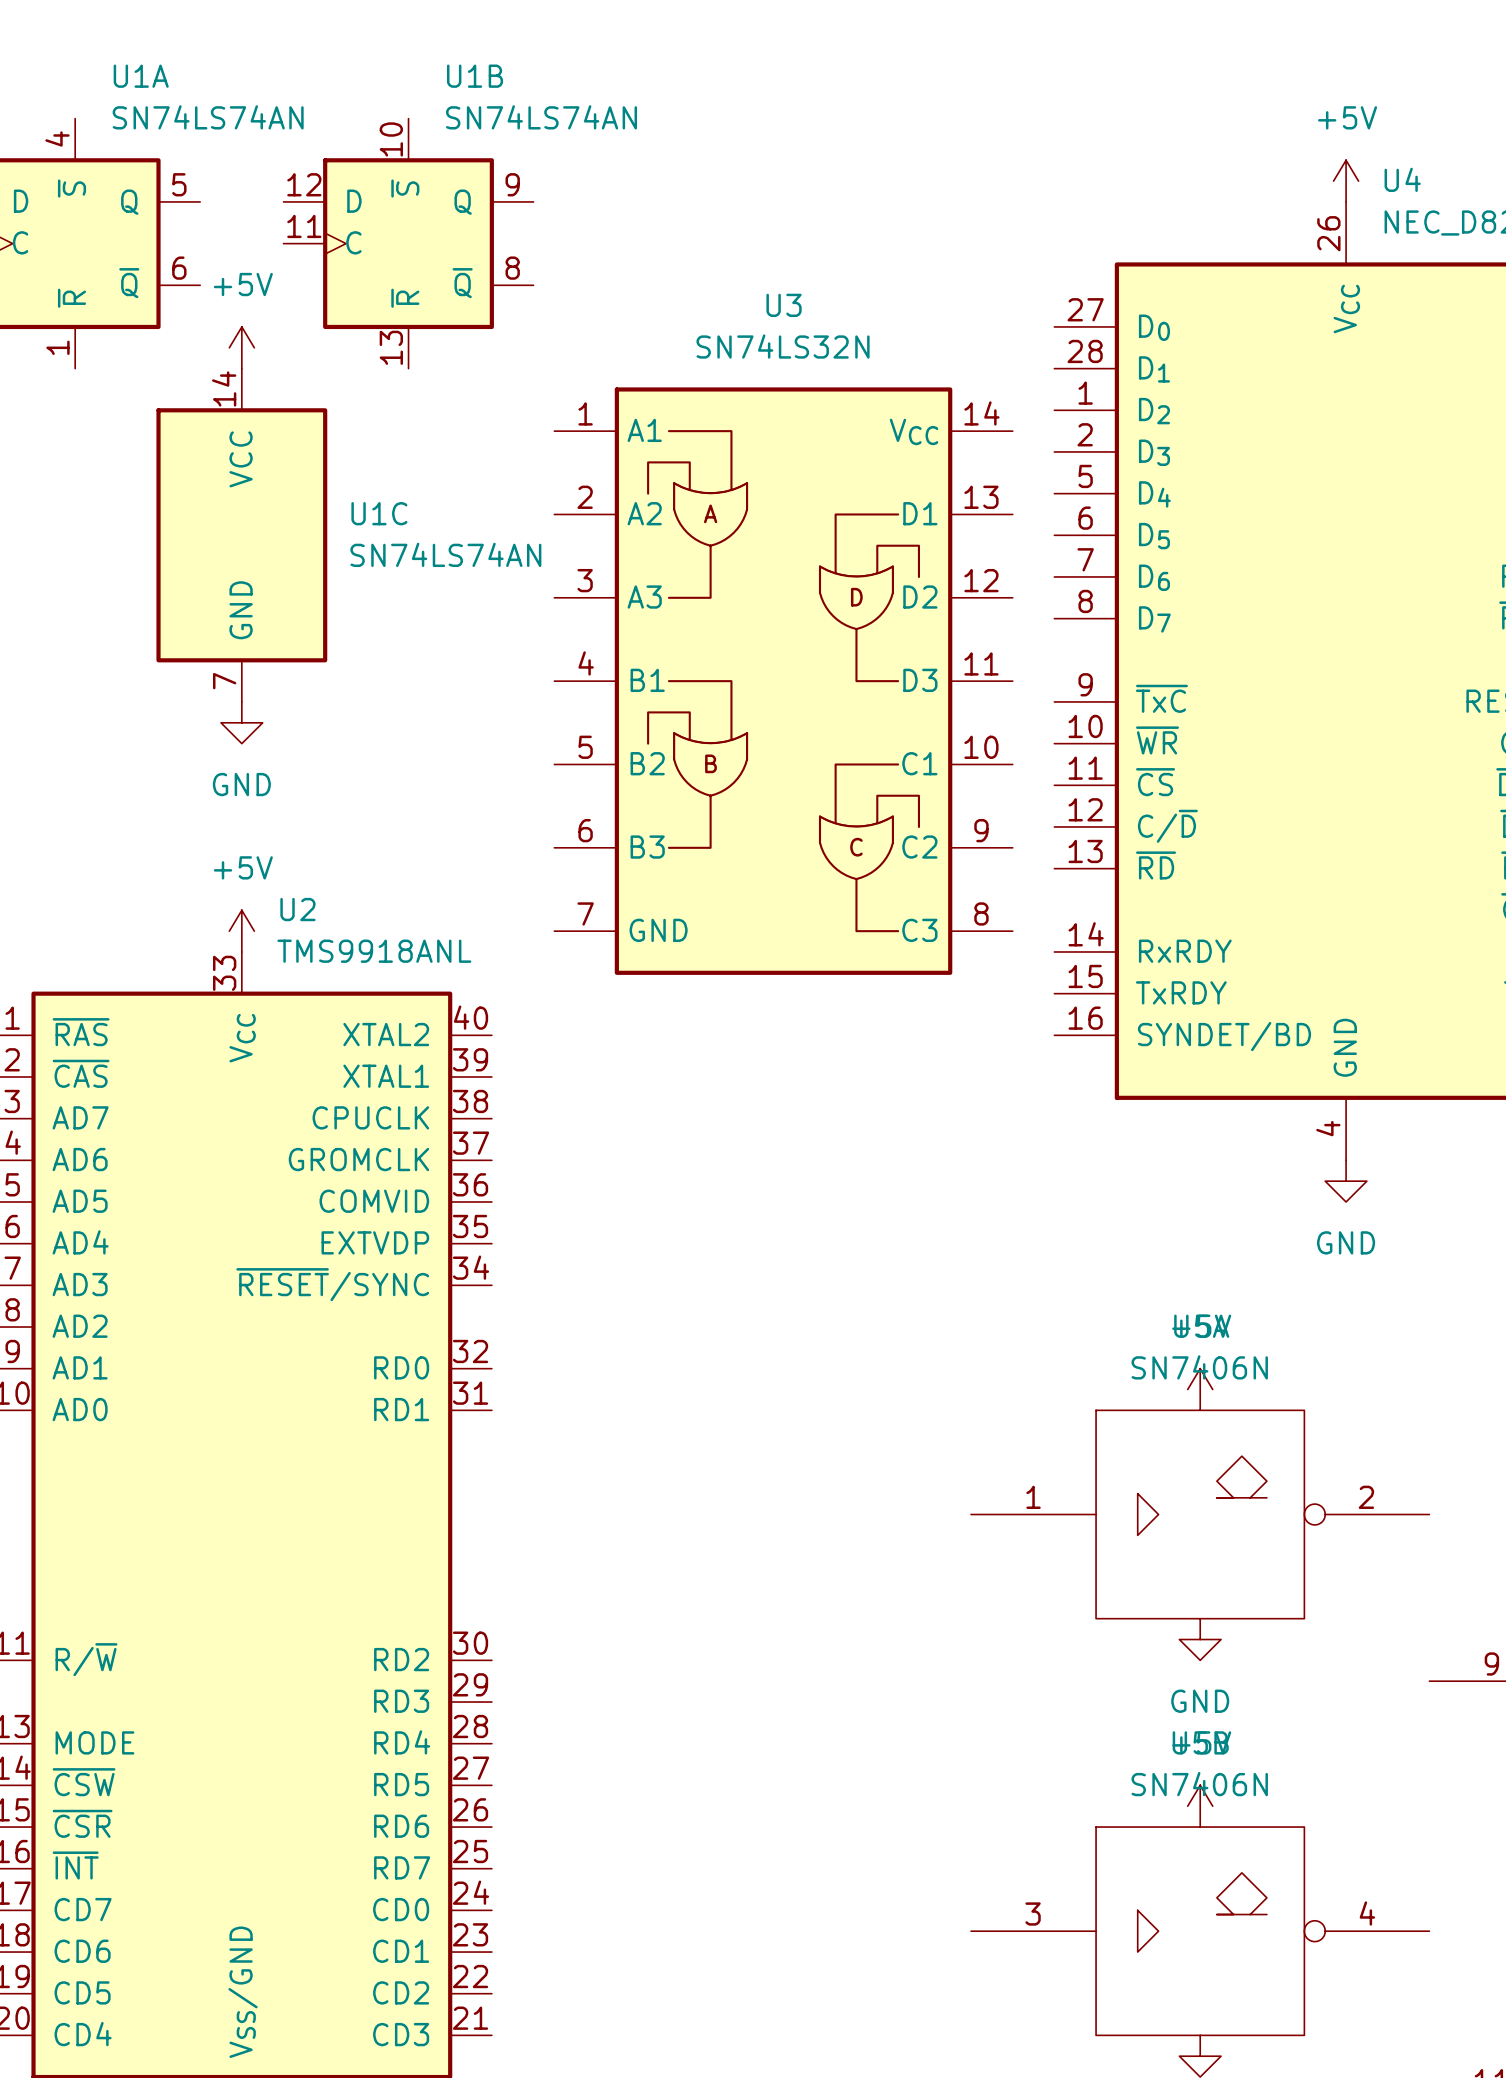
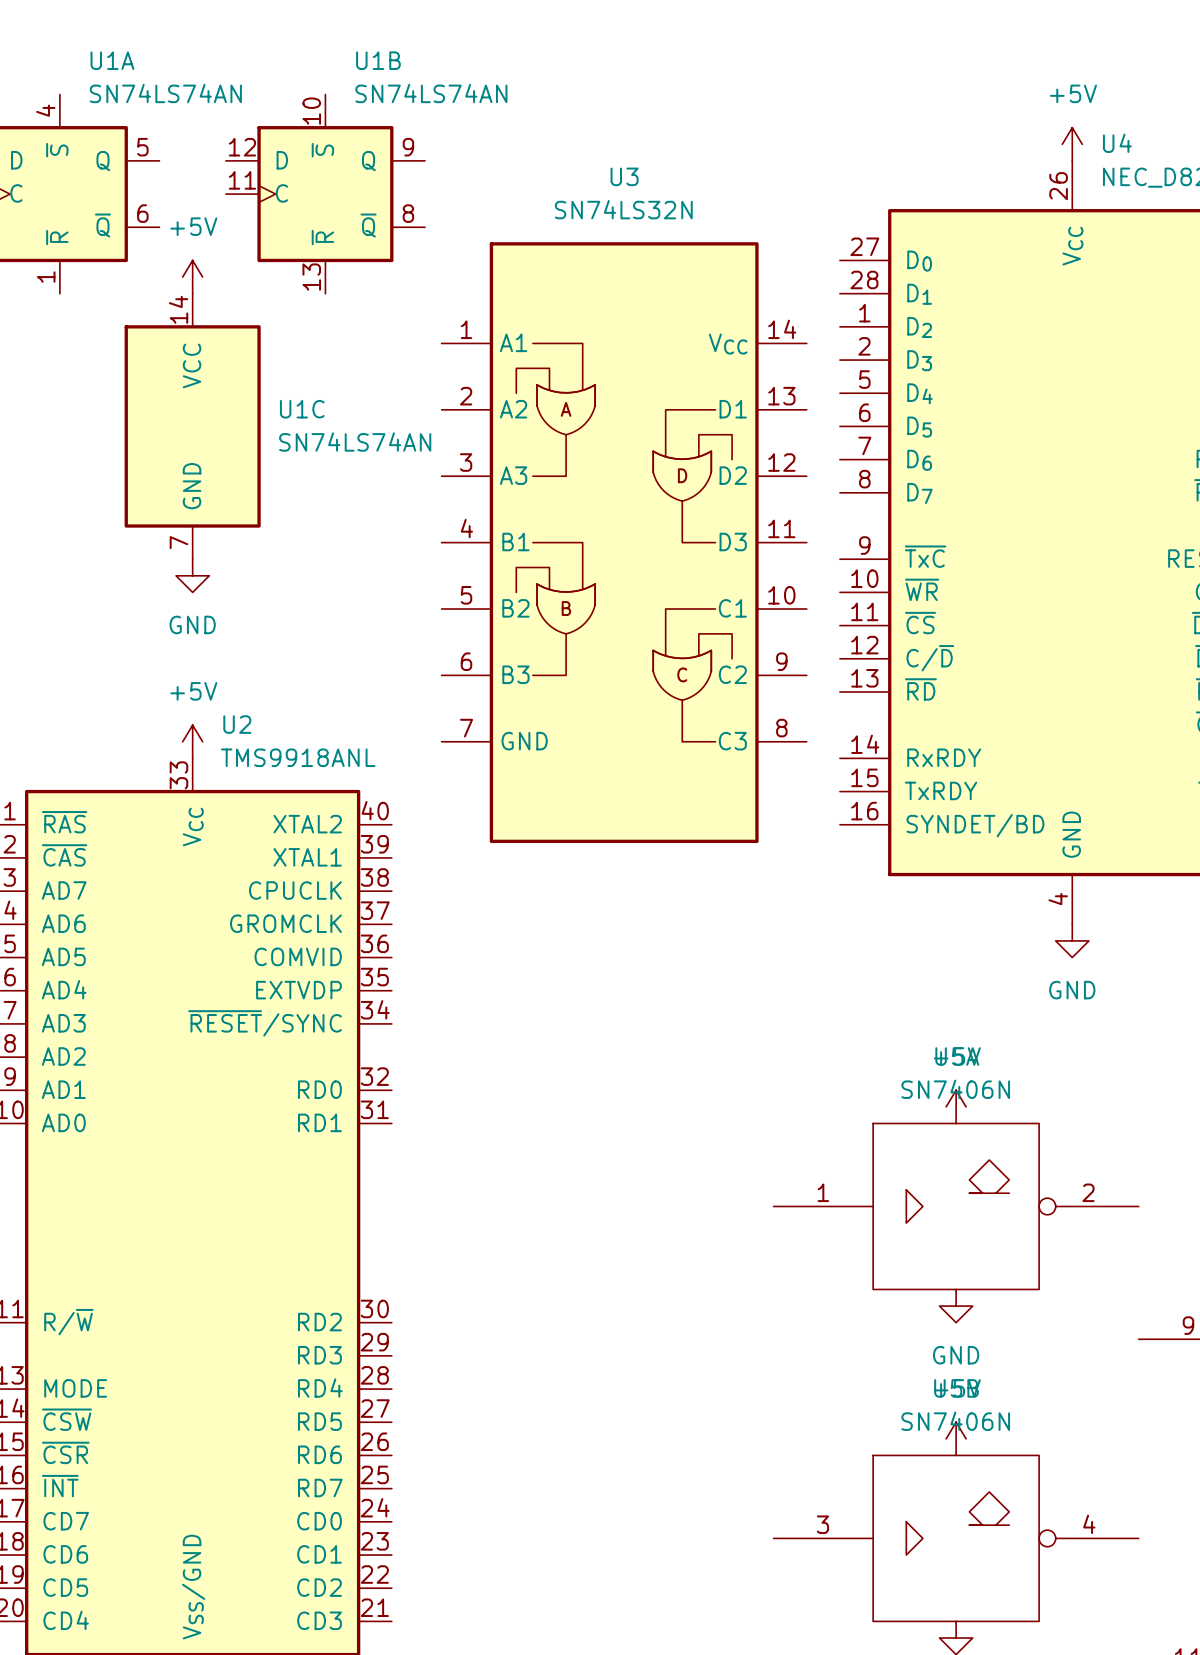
U3 name position: U3 (784, 305) -> U3 (624, 176)
U3 value position: SN74LS32N (783, 346) -> SN74LS32N (623, 209)
U3 symbol: [554, 387, 1013, 975] -> [441, 242, 807, 844]

